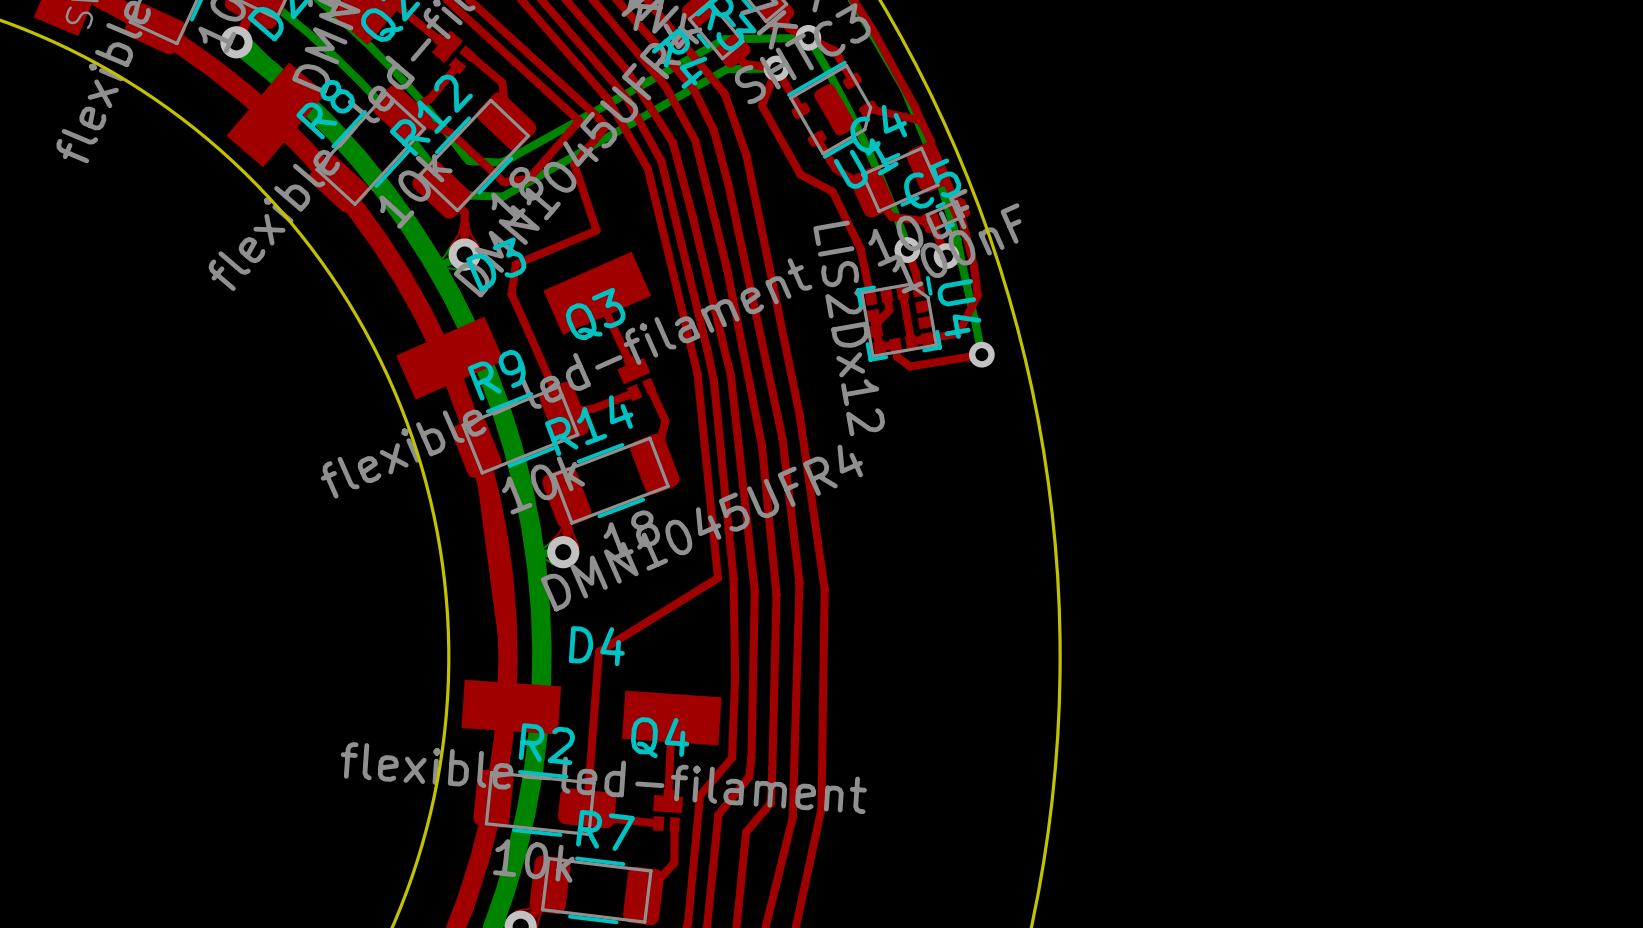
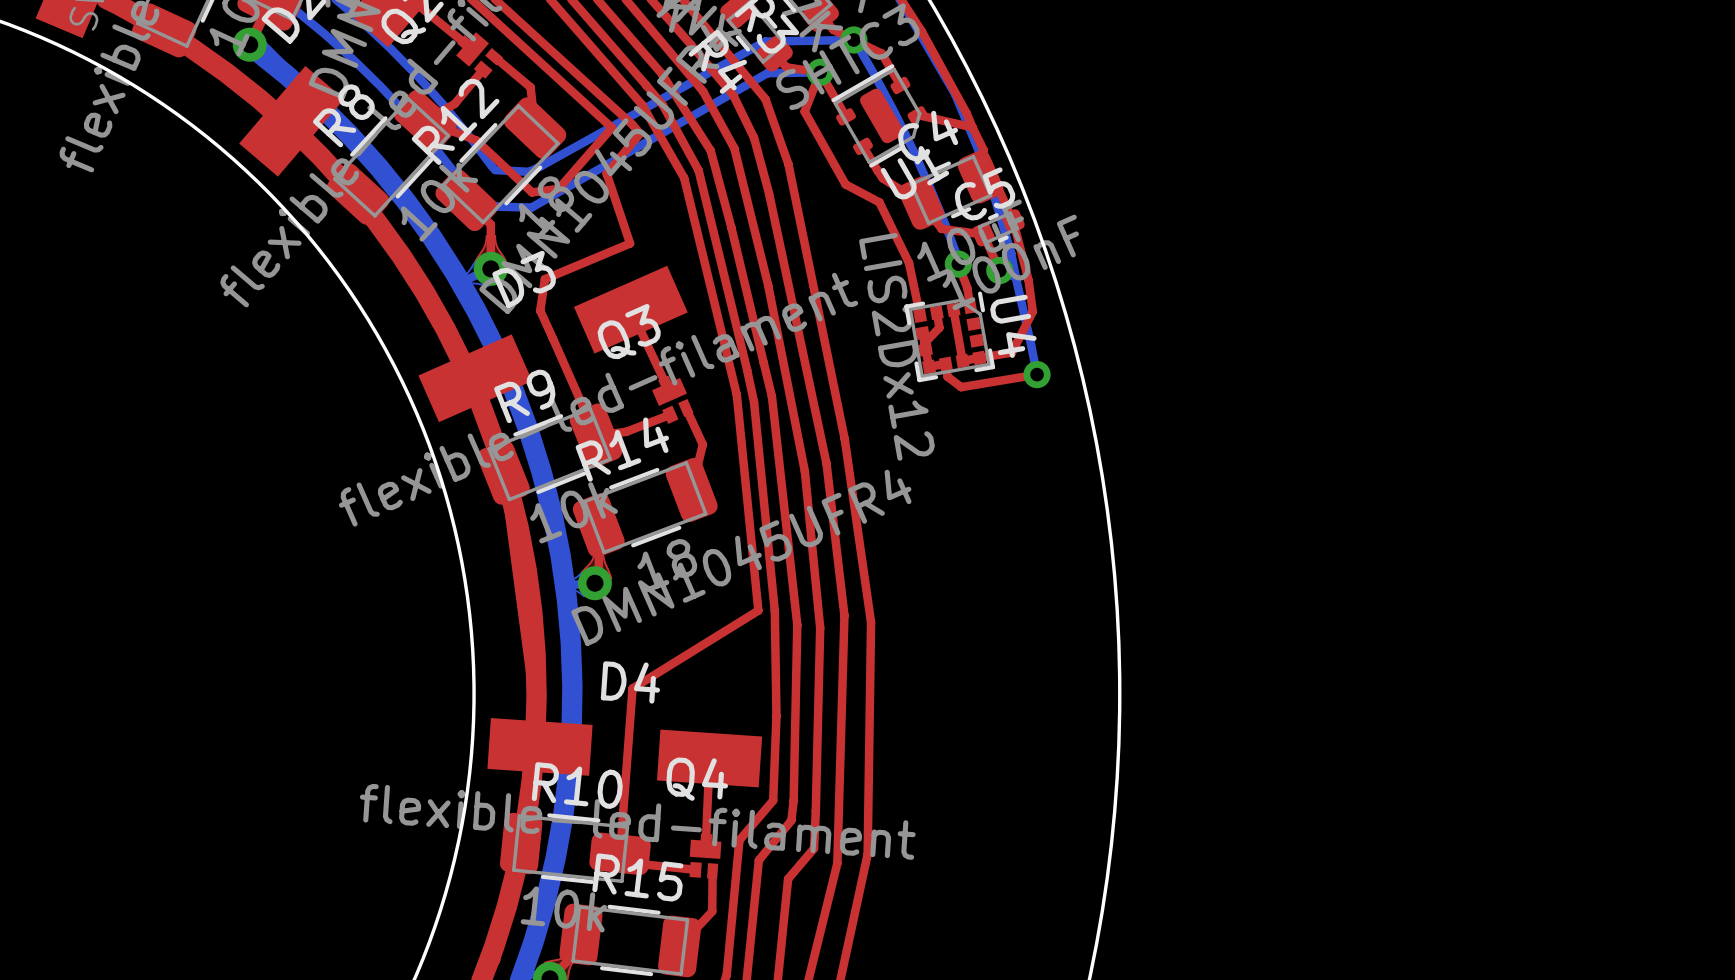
R2 name: R2 (546, 744) -> R10 (577, 785)
R7 name: R7 (605, 830) -> R15 (637, 877)

